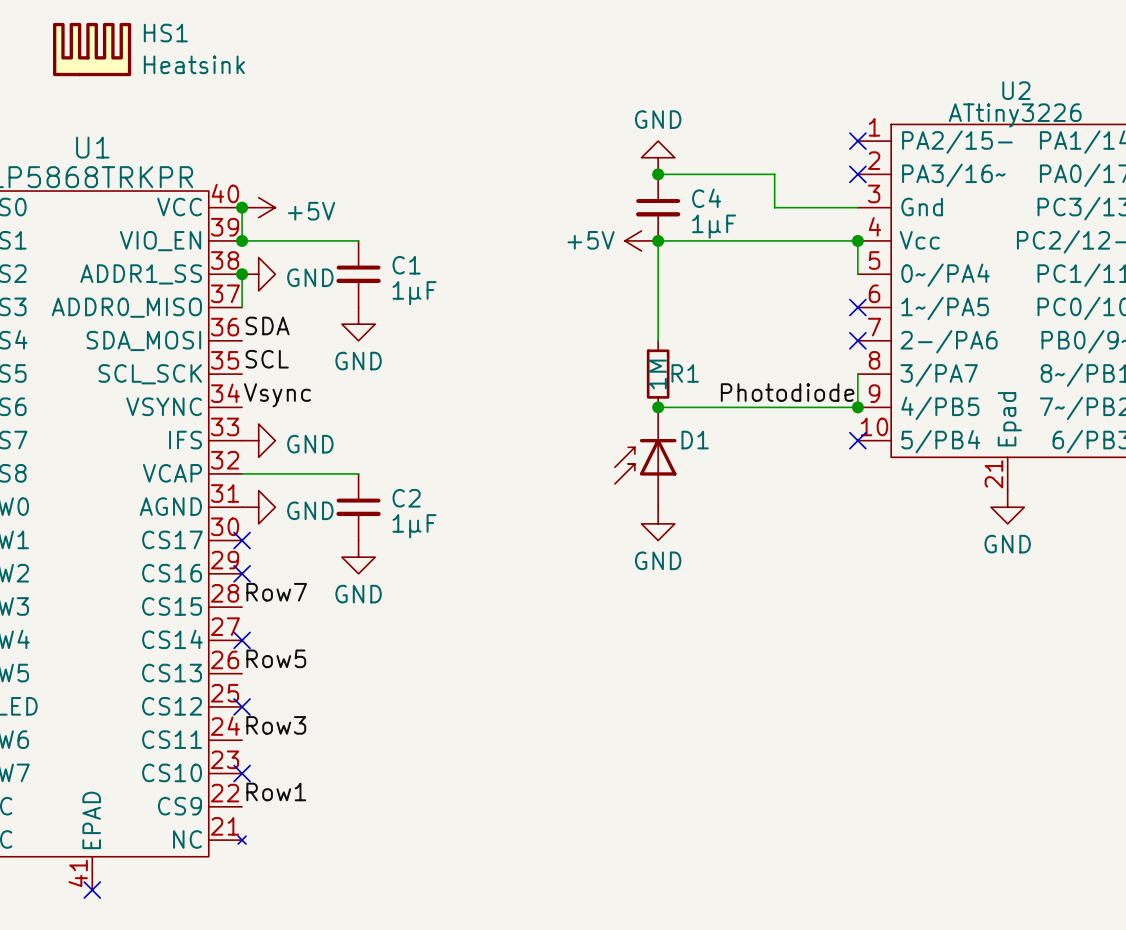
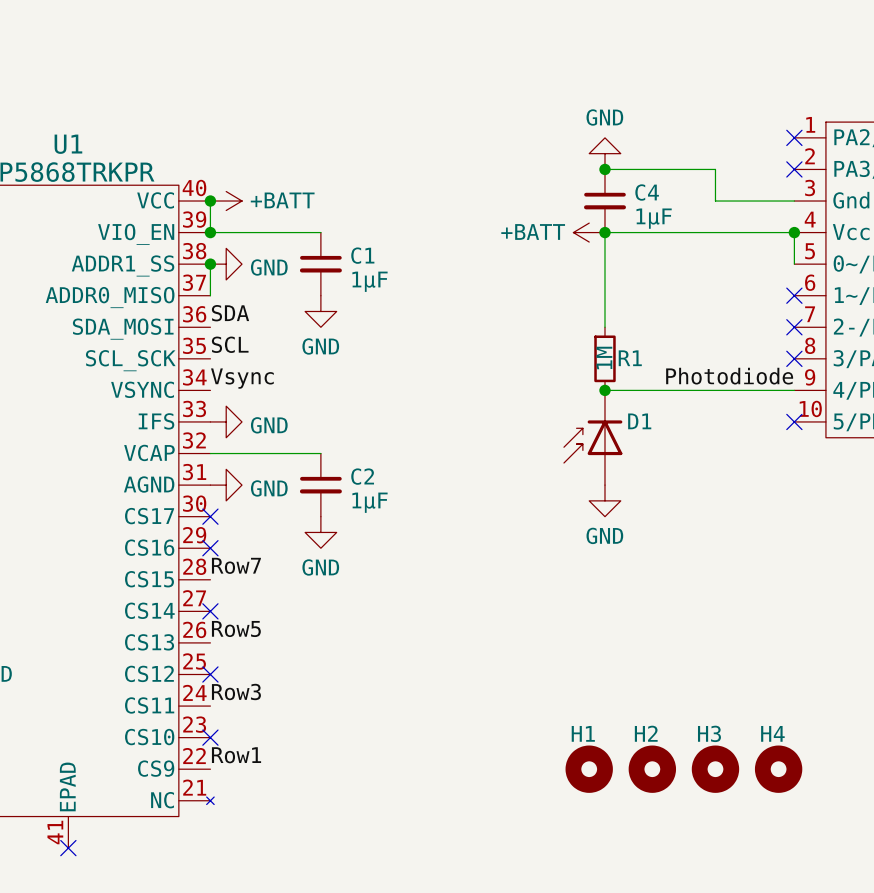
HS1: Heatsink (92, 49) -> none
power symbol: +5V (258, 207) -> +BATT (226, 201)
power symbol: +5V (641, 240) -> +BATT (589, 232)
wire: (857, 374) (857, 407) -> none
no-connect mark: none -> (794, 358)
junction: (857, 407) -> none
H1: none -> (589, 769)
H2: none -> (652, 769)
H3: none -> (715, 769)
H4: none -> (778, 769)

